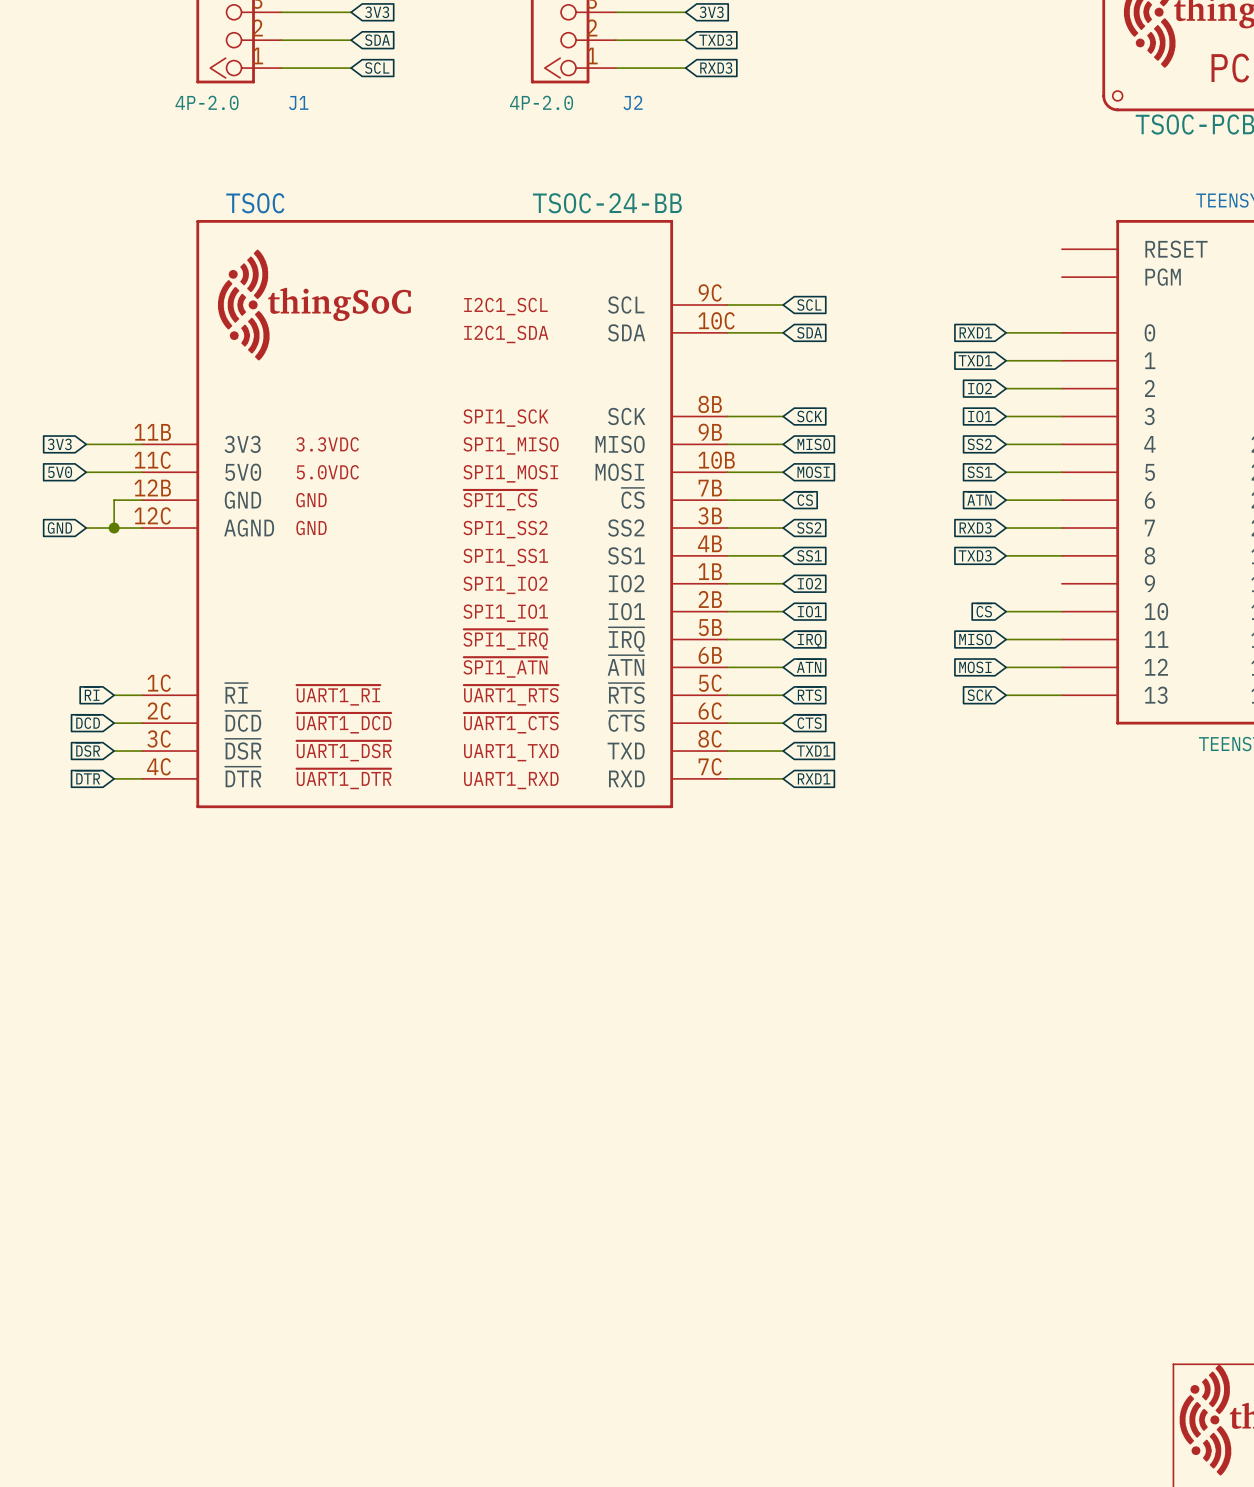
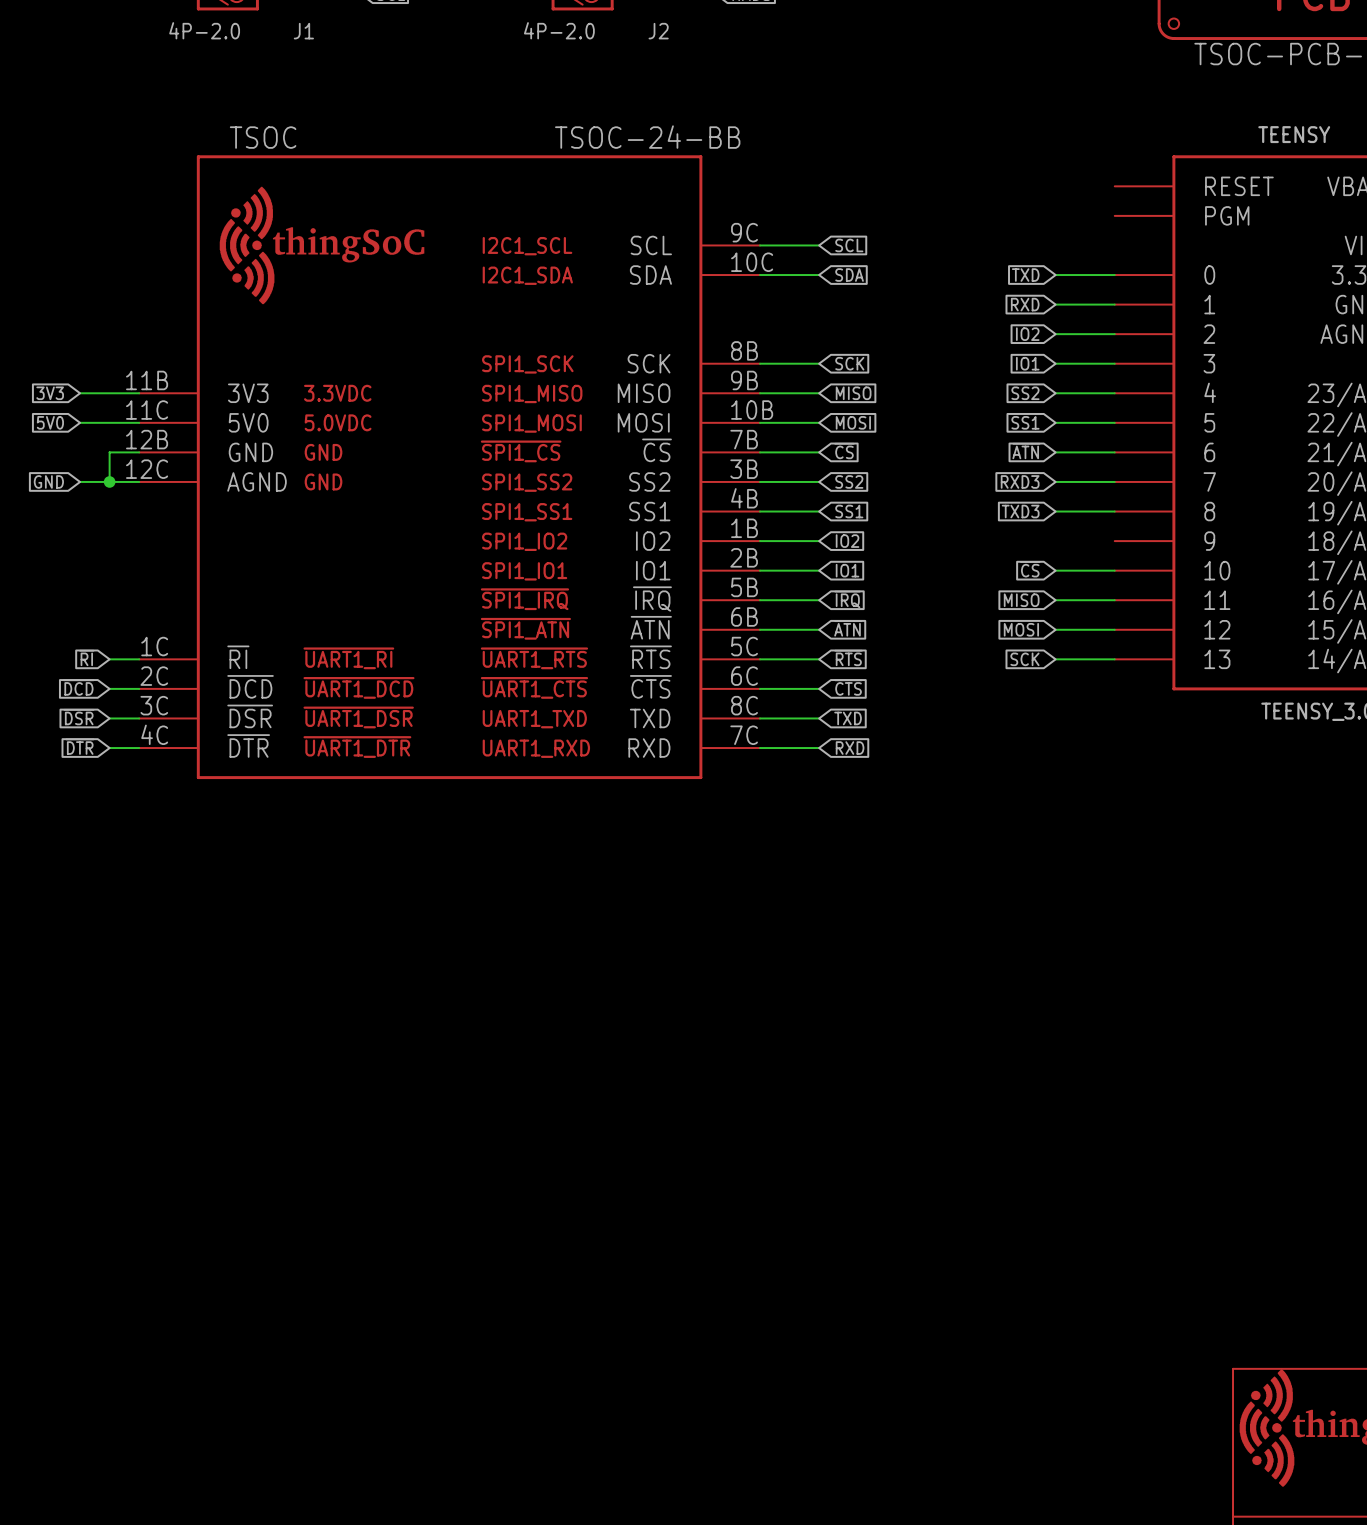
global label: RXD1 (975, 332) -> TXD (1025, 275)
global label: TXD1 (975, 360) -> RXD (1025, 304)
global label: TXD1 (813, 751) -> TXD (848, 718)
global label: RXD1 (814, 778) -> RXD (850, 748)

